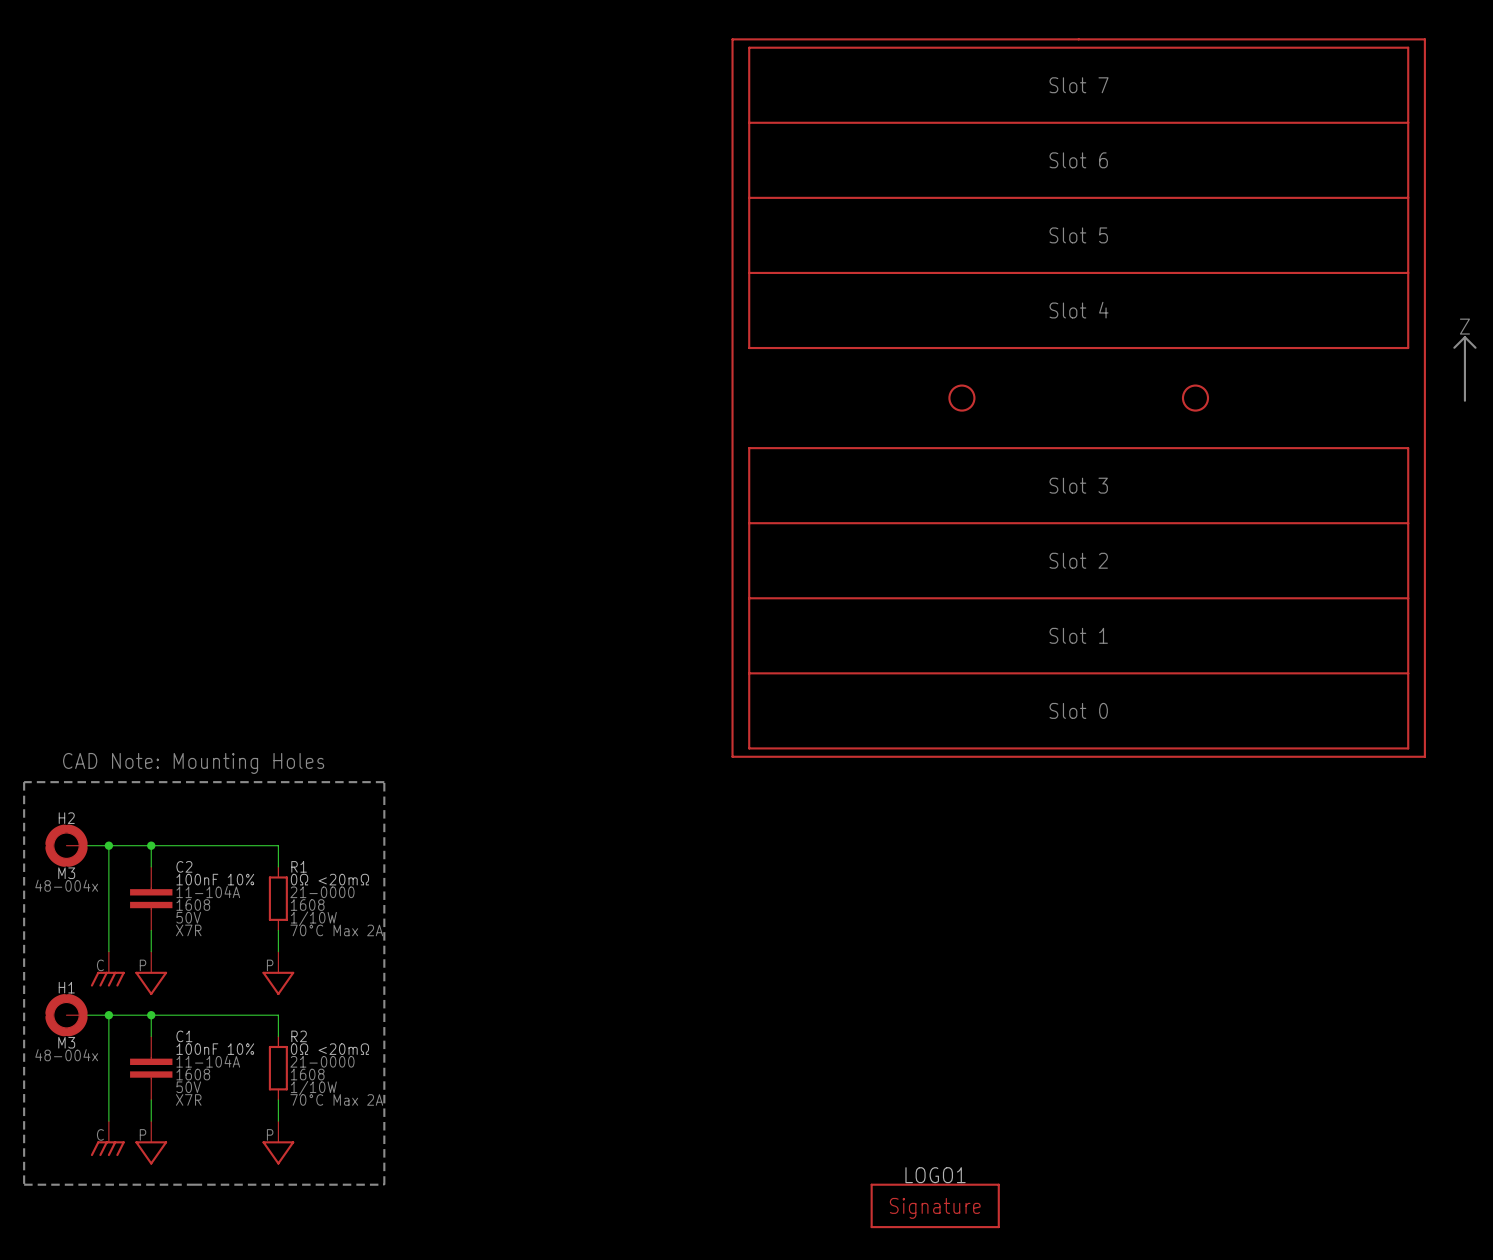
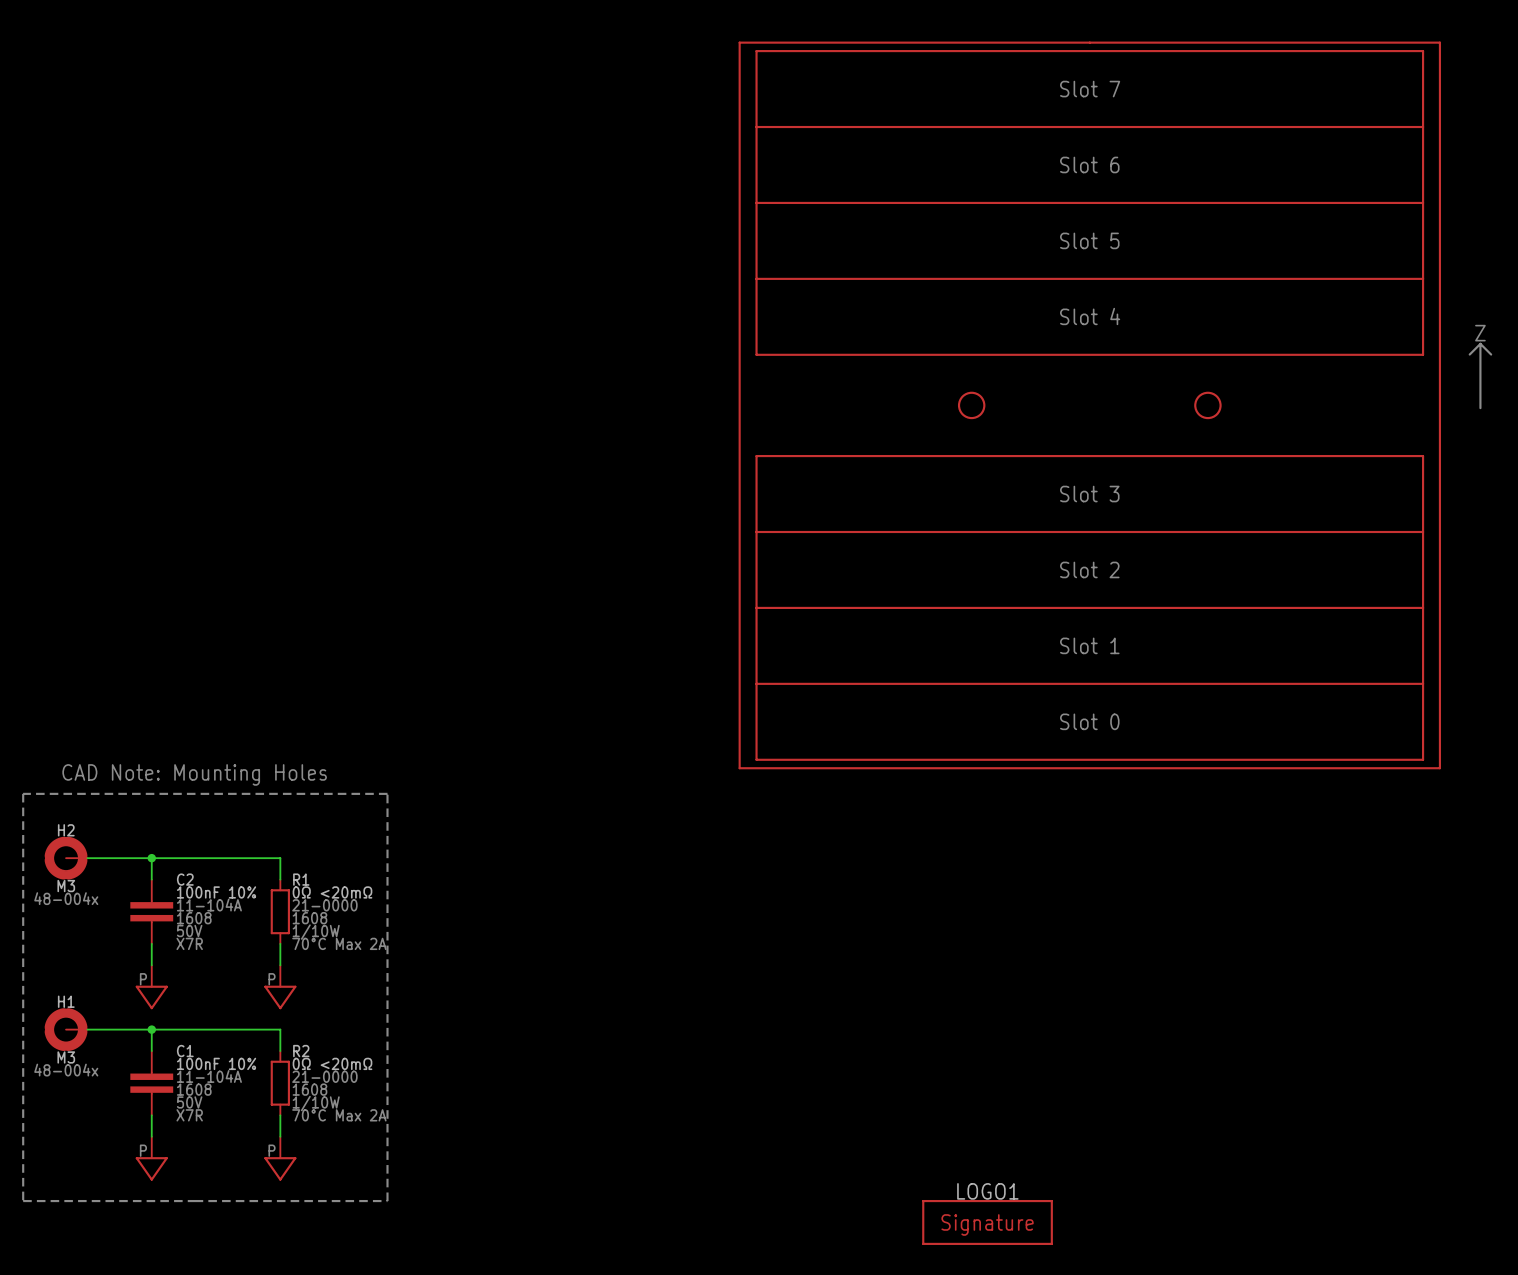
wire: (108, 845) (108, 951) -> none
junction: (108, 845) -> none
power symbol: (107, 969) -> none
wire: (108, 1015) (108, 1121) -> none
junction: (108, 1015) -> none
power symbol: (107, 1138) -> none
LOGO1 position: (935, 1205) -> (987, 1222)

